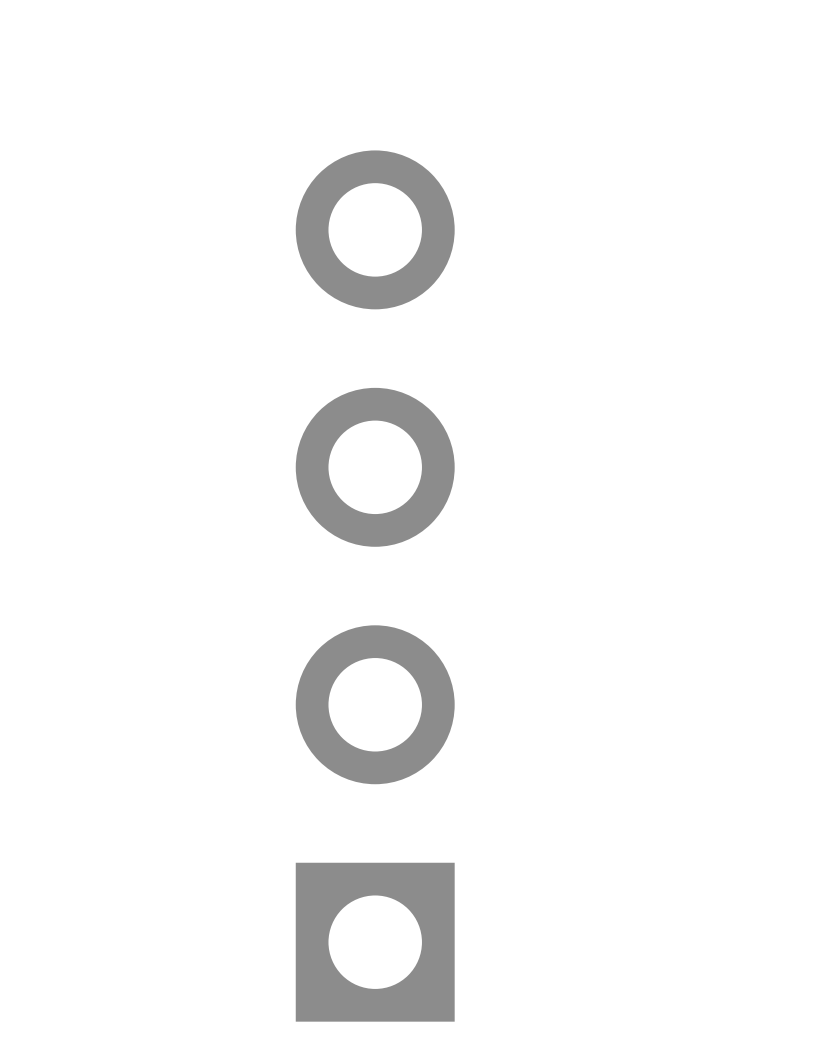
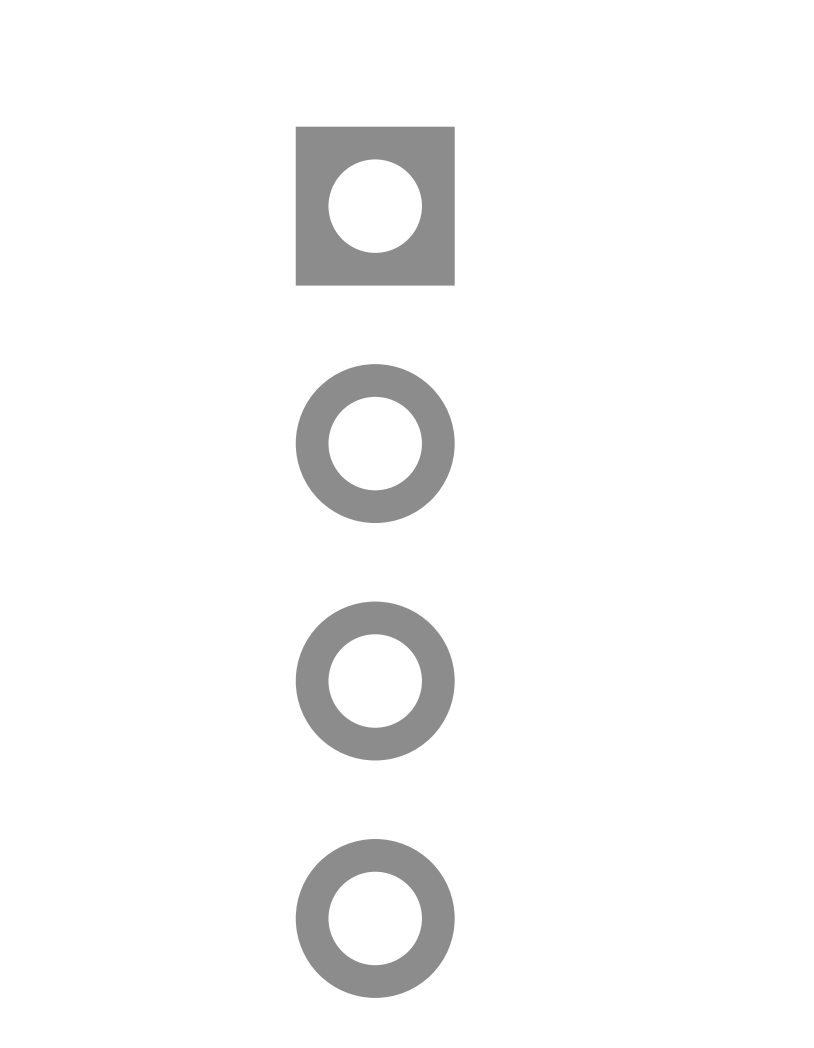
part rotation: 0° (375, 586) -> 180° (375, 562)

